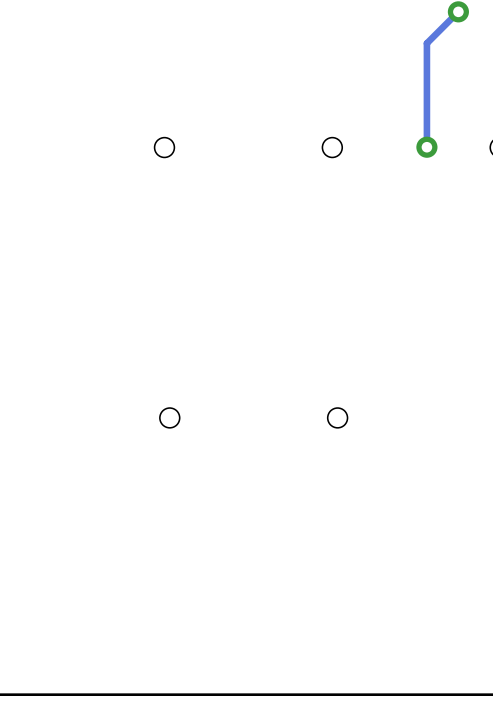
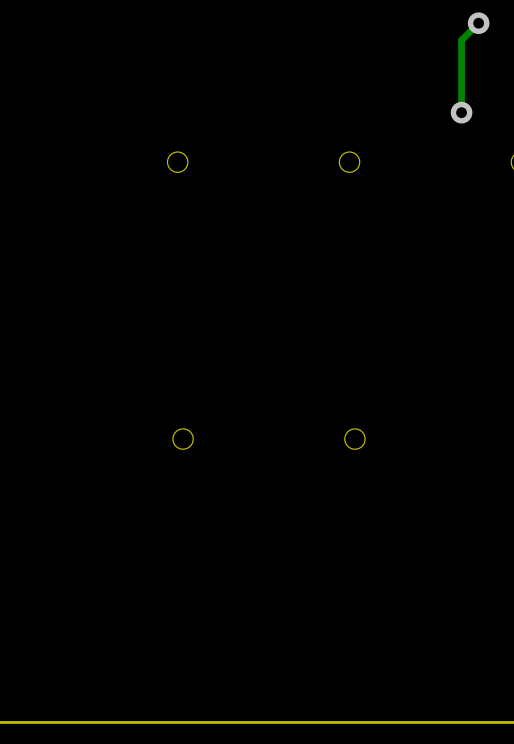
track: (441, 28) (426, 43) (426, 147) -> (461, 40) (461, 112)
via position: (426, 147) -> (461, 112)

